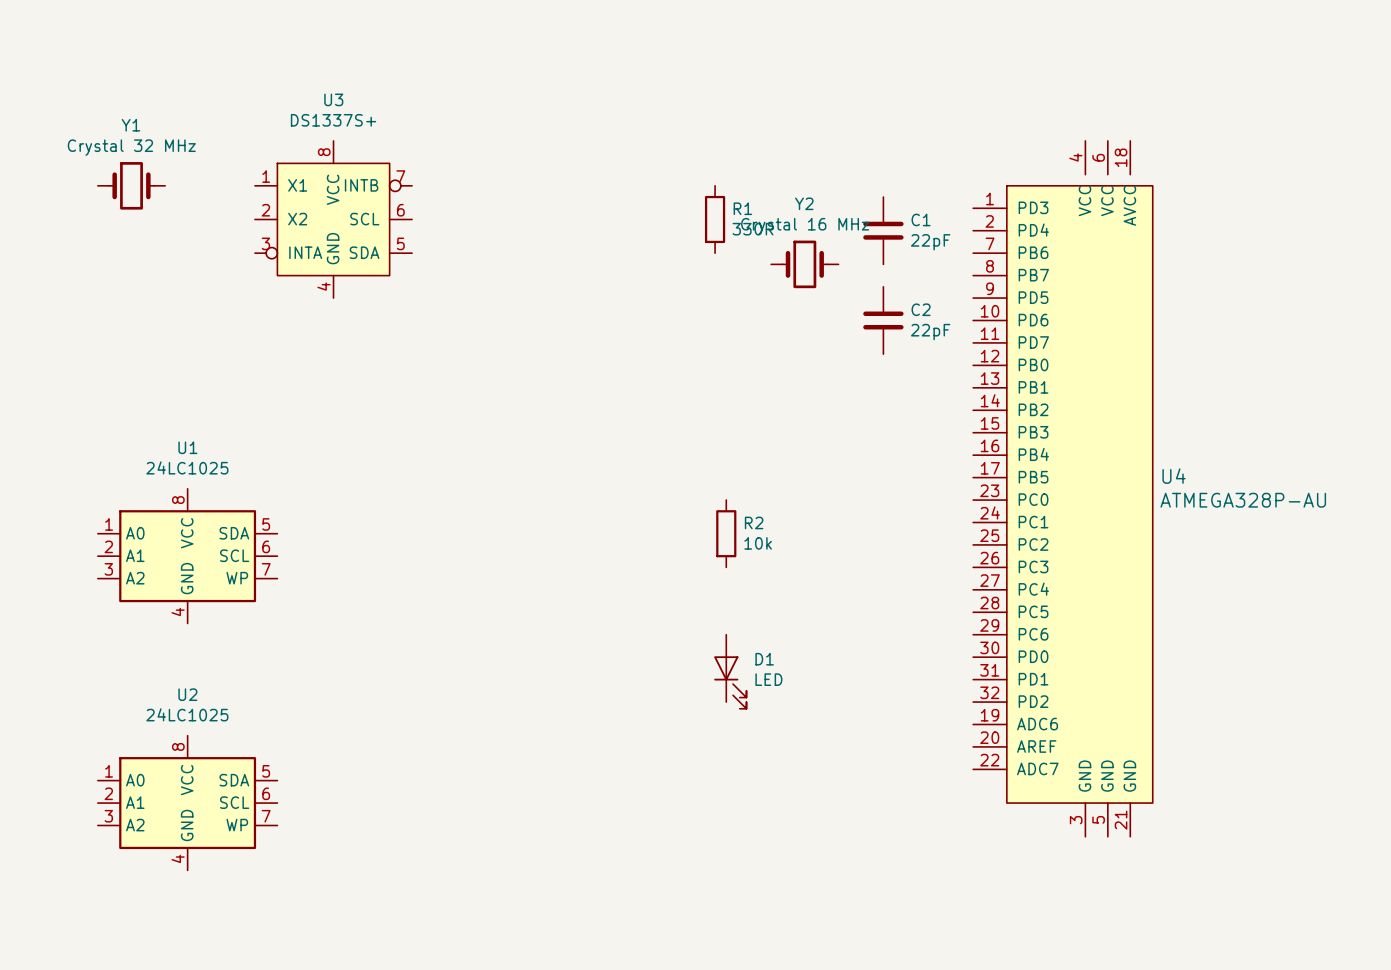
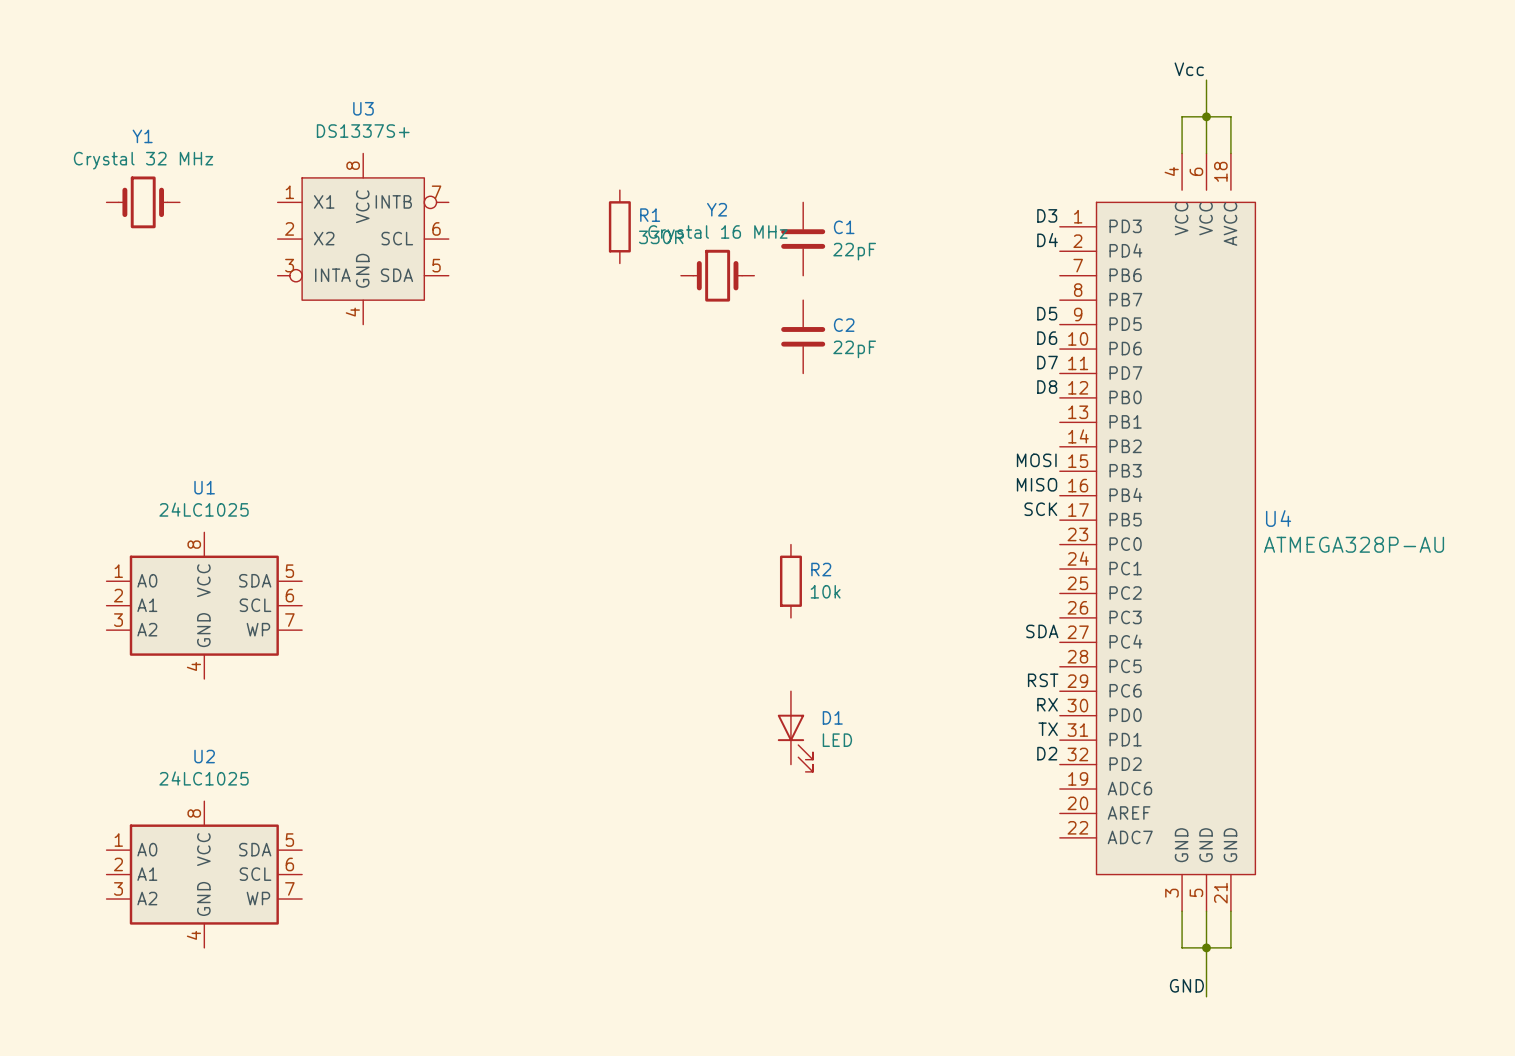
label: none -> Vcc (1189, 69)
wire: none -> (1206, 80) (1206, 153)
junction: none -> (1206, 116)
wire: none -> (1182, 153) (1182, 116) (1230, 116) (1230, 153)
label: none -> D3 (1047, 215)
R1 position: (715, 219) -> (619, 226)
label: none -> D4 (1047, 240)
C1 position: (883, 230) -> (803, 239)
Y2 position: (804, 264) -> (717, 275)
label: none -> D5 (1047, 313)
label: none -> D6 (1047, 338)
C2 position: (883, 320) -> (803, 336)
label: none -> D7 (1047, 362)
label: none -> D8 (1047, 387)
label: none -> MOSI (1036, 460)
label: none -> MISO (1037, 484)
label: none -> SCK (1040, 509)
label: none -> SDA (1042, 631)
label: none -> RST (1043, 680)
label: none -> RX (1047, 704)
label: none -> TX (1048, 729)
label: none -> D2 (1047, 753)
wire: none -> (1182, 911) (1182, 947) (1230, 947) (1230, 911)
wire: none -> (1206, 911) (1206, 996)
junction: none -> (1206, 947)
label: none -> GND (1186, 985)

